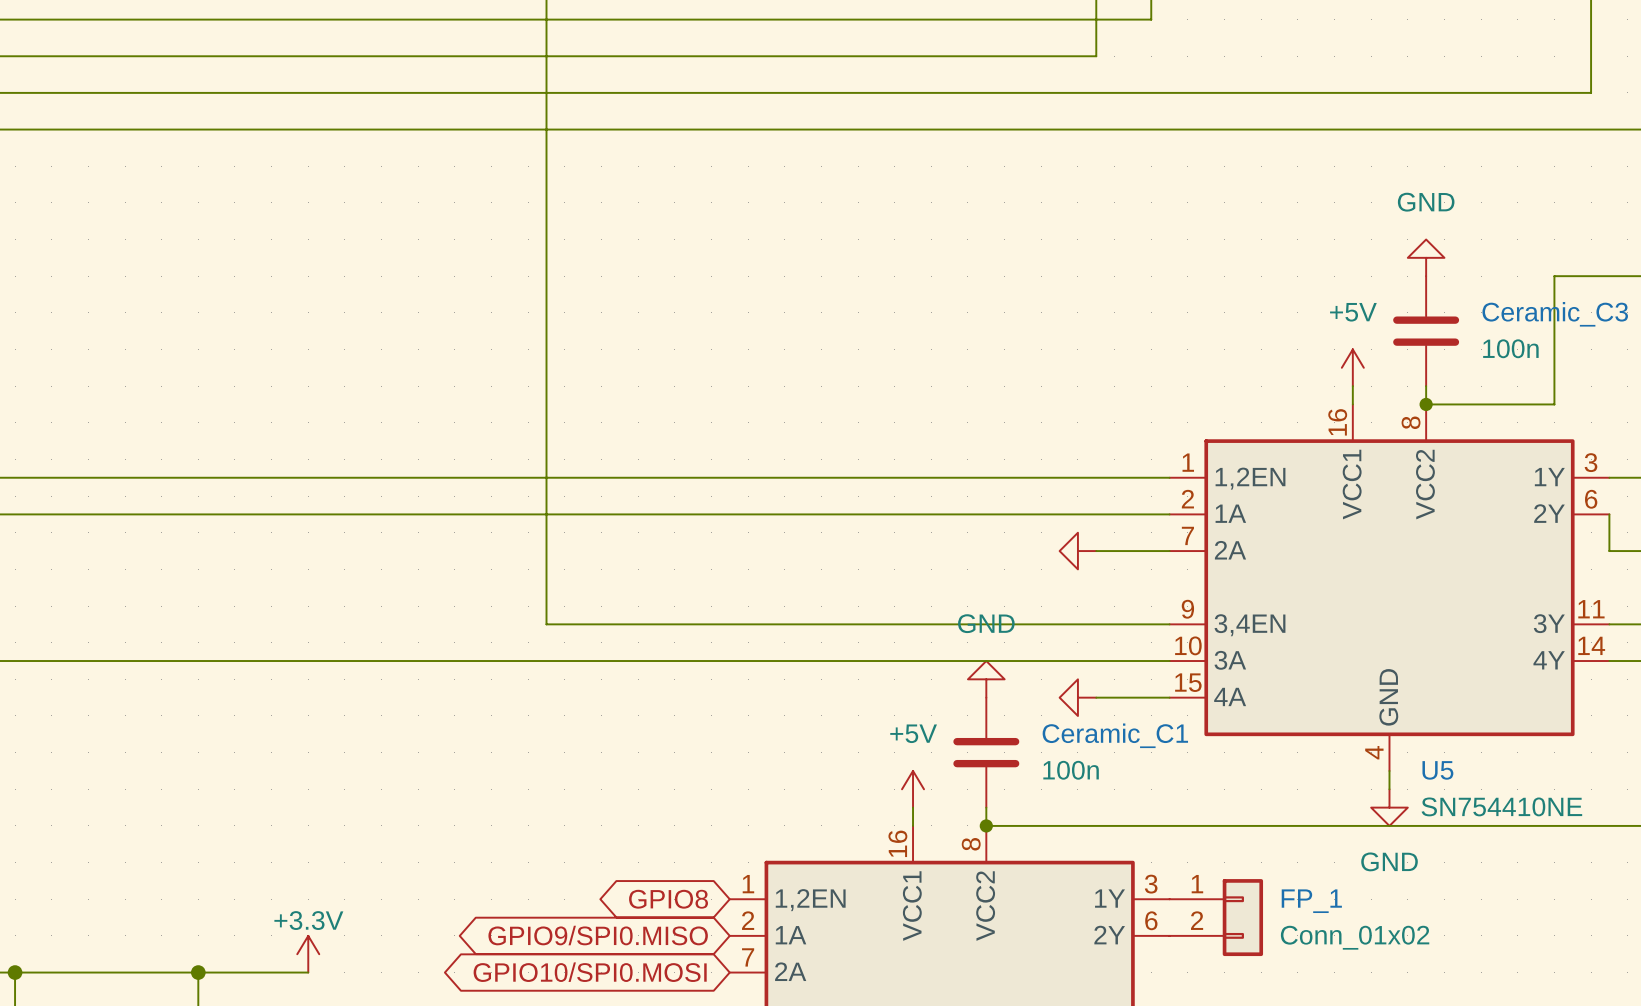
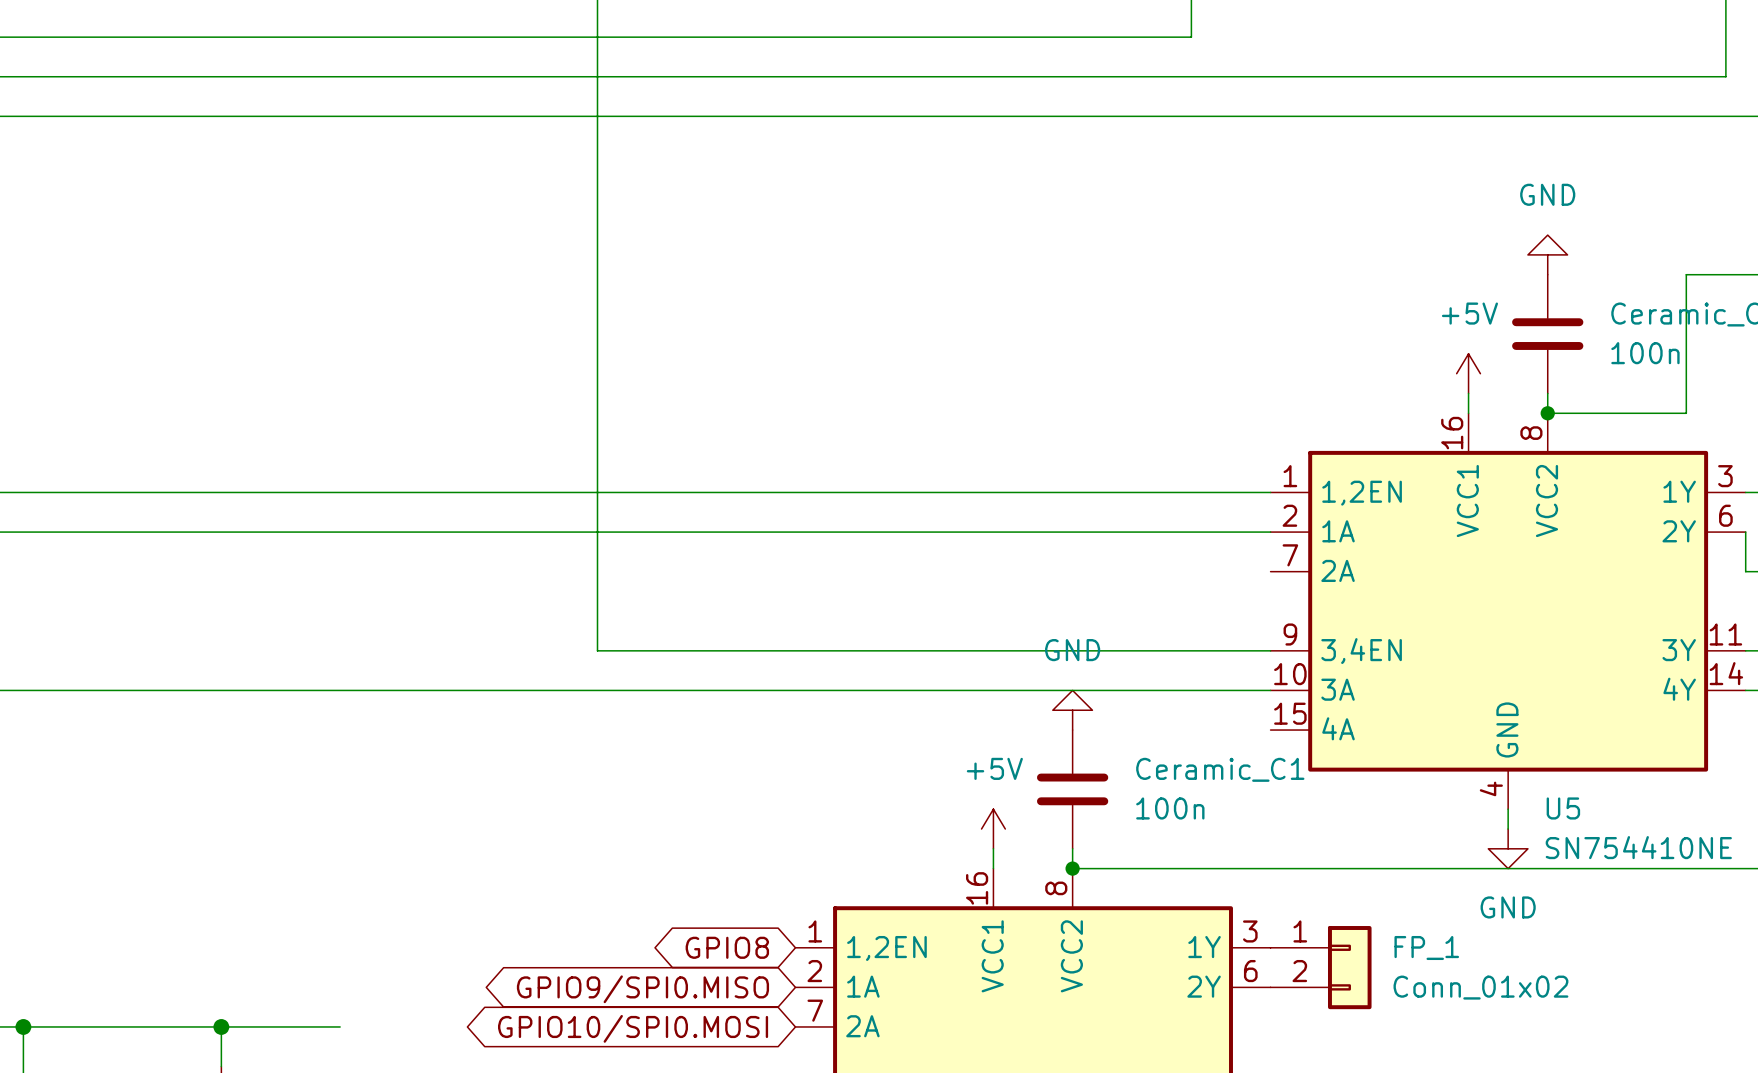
power symbol: (1077, 551) -> none
wire: (1096, 551) (1169, 551) -> none
power symbol: (1077, 697) -> none
wire: (1096, 697) (1169, 697) -> none
power symbol: +3.3V (308, 954) -> none

